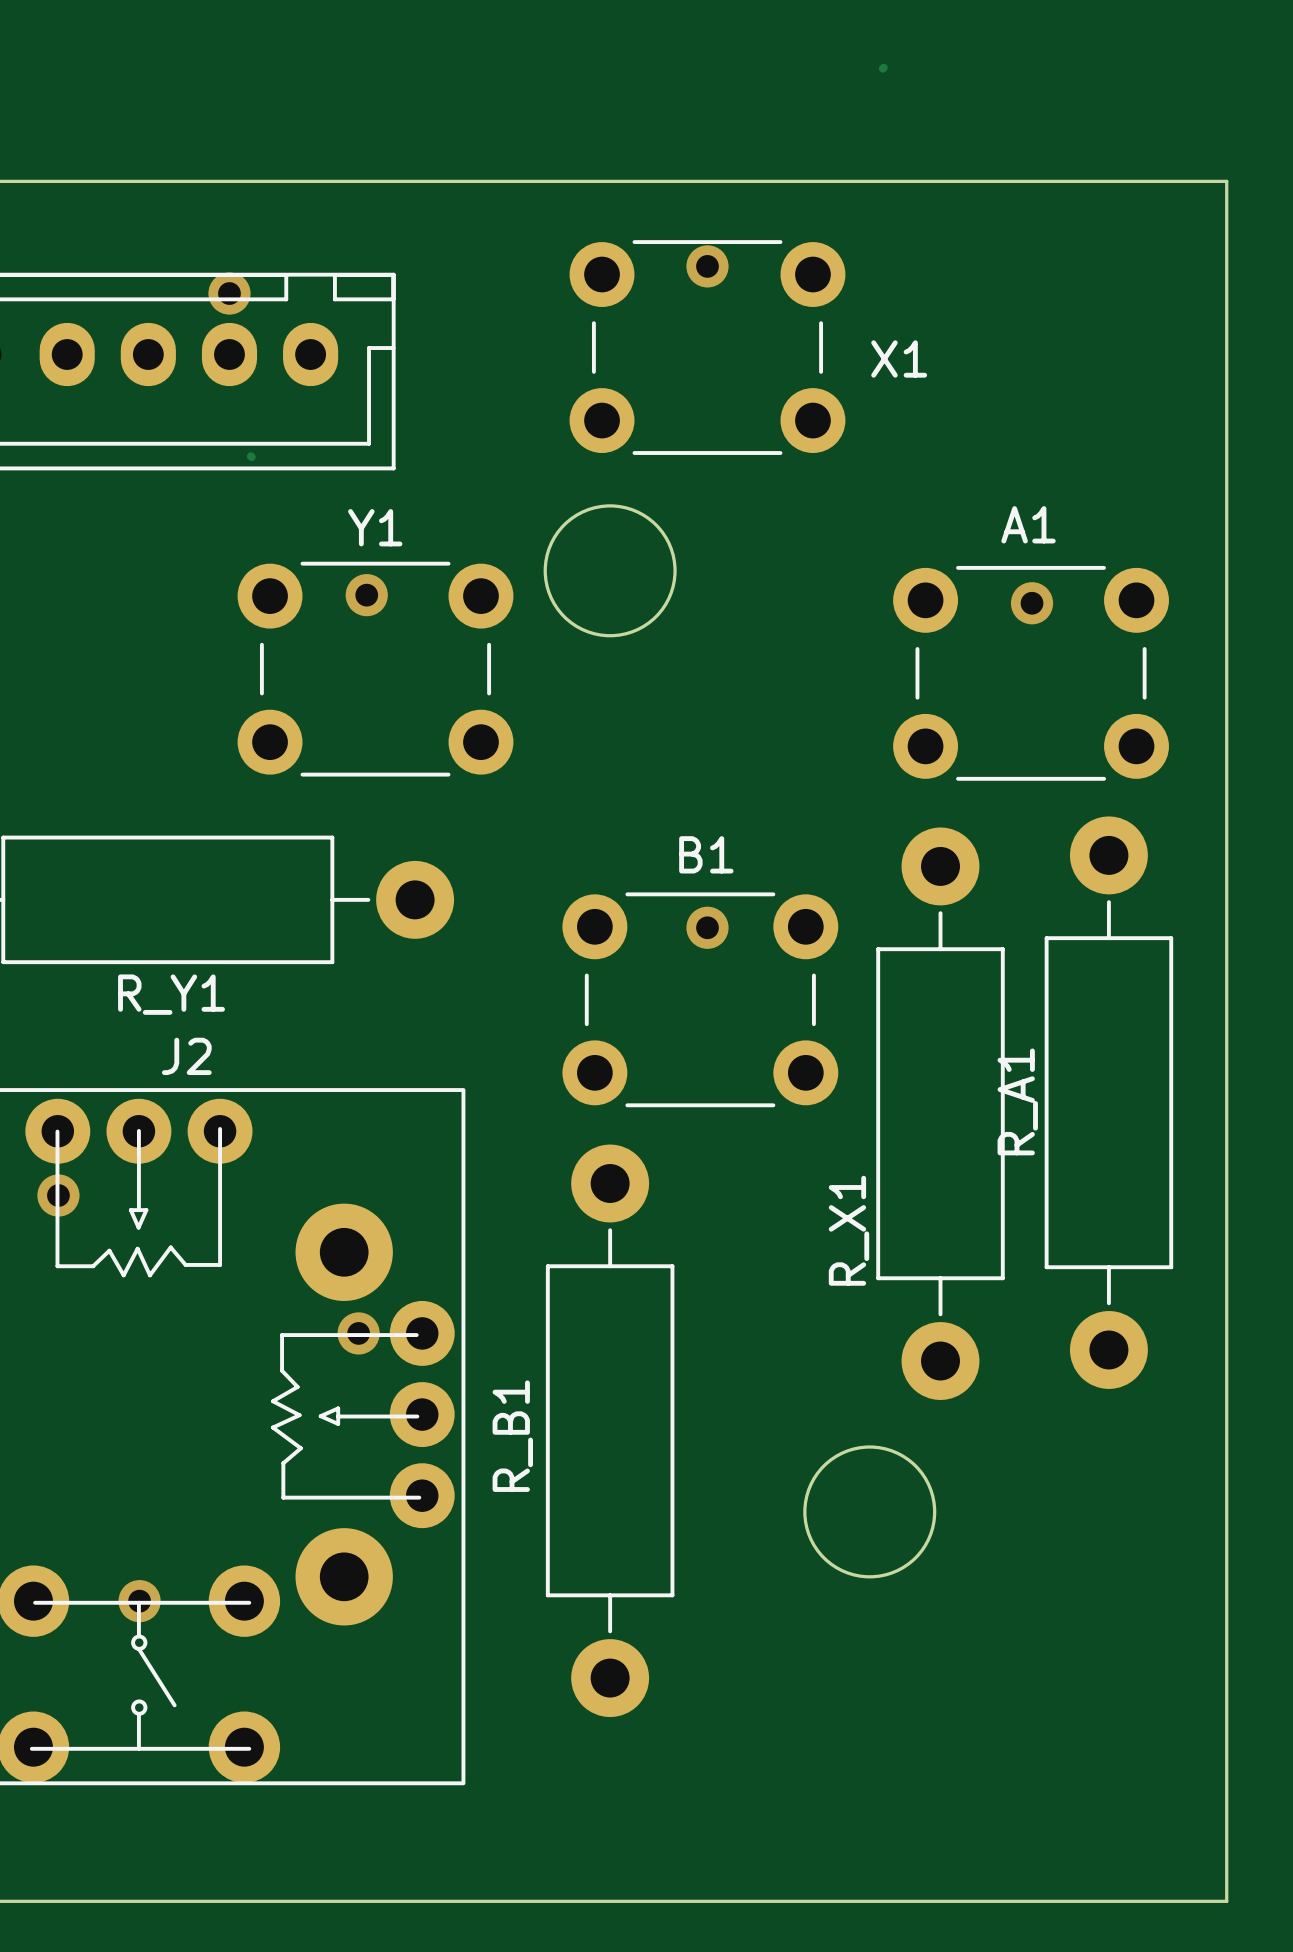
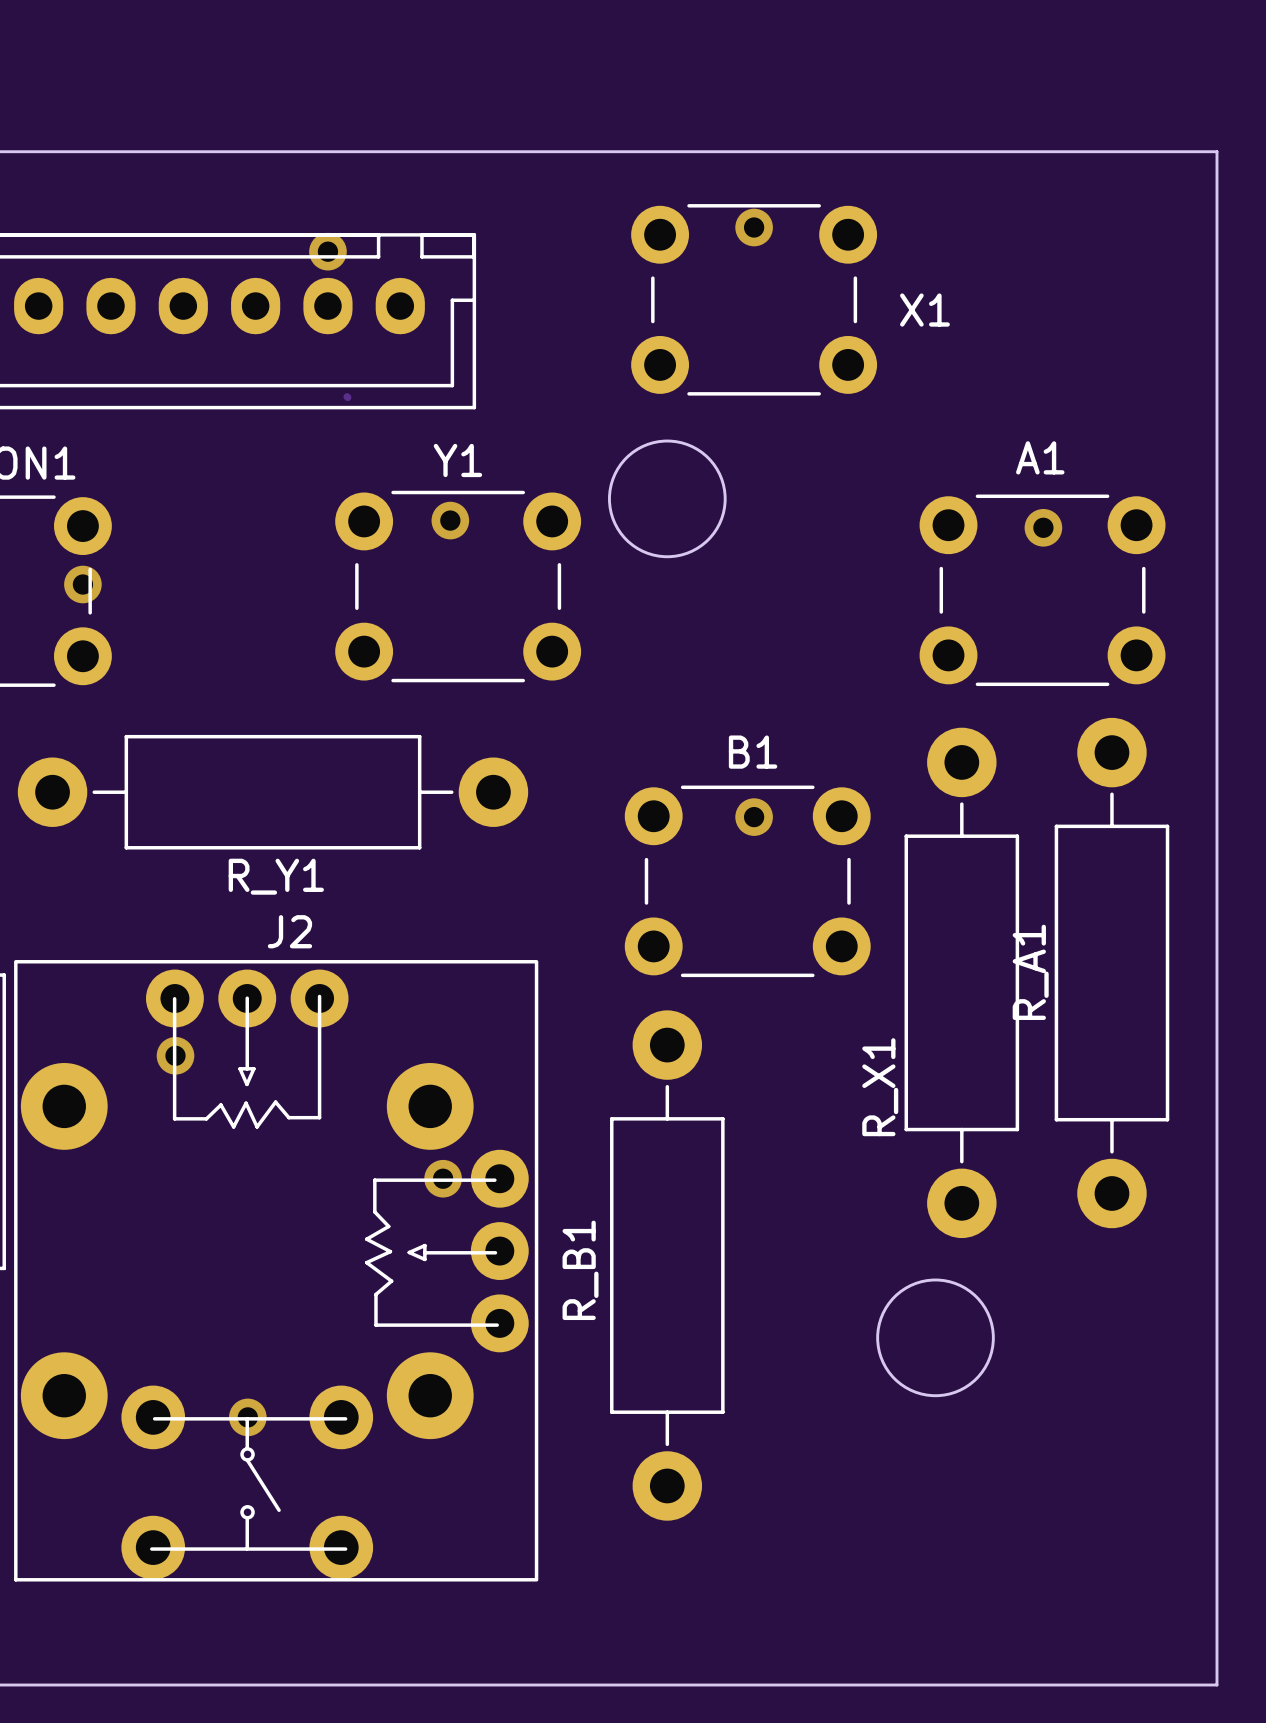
track: (883, 67) (882, 68) -> none
round board edge position: (869, 1511) -> (935, 1337)

